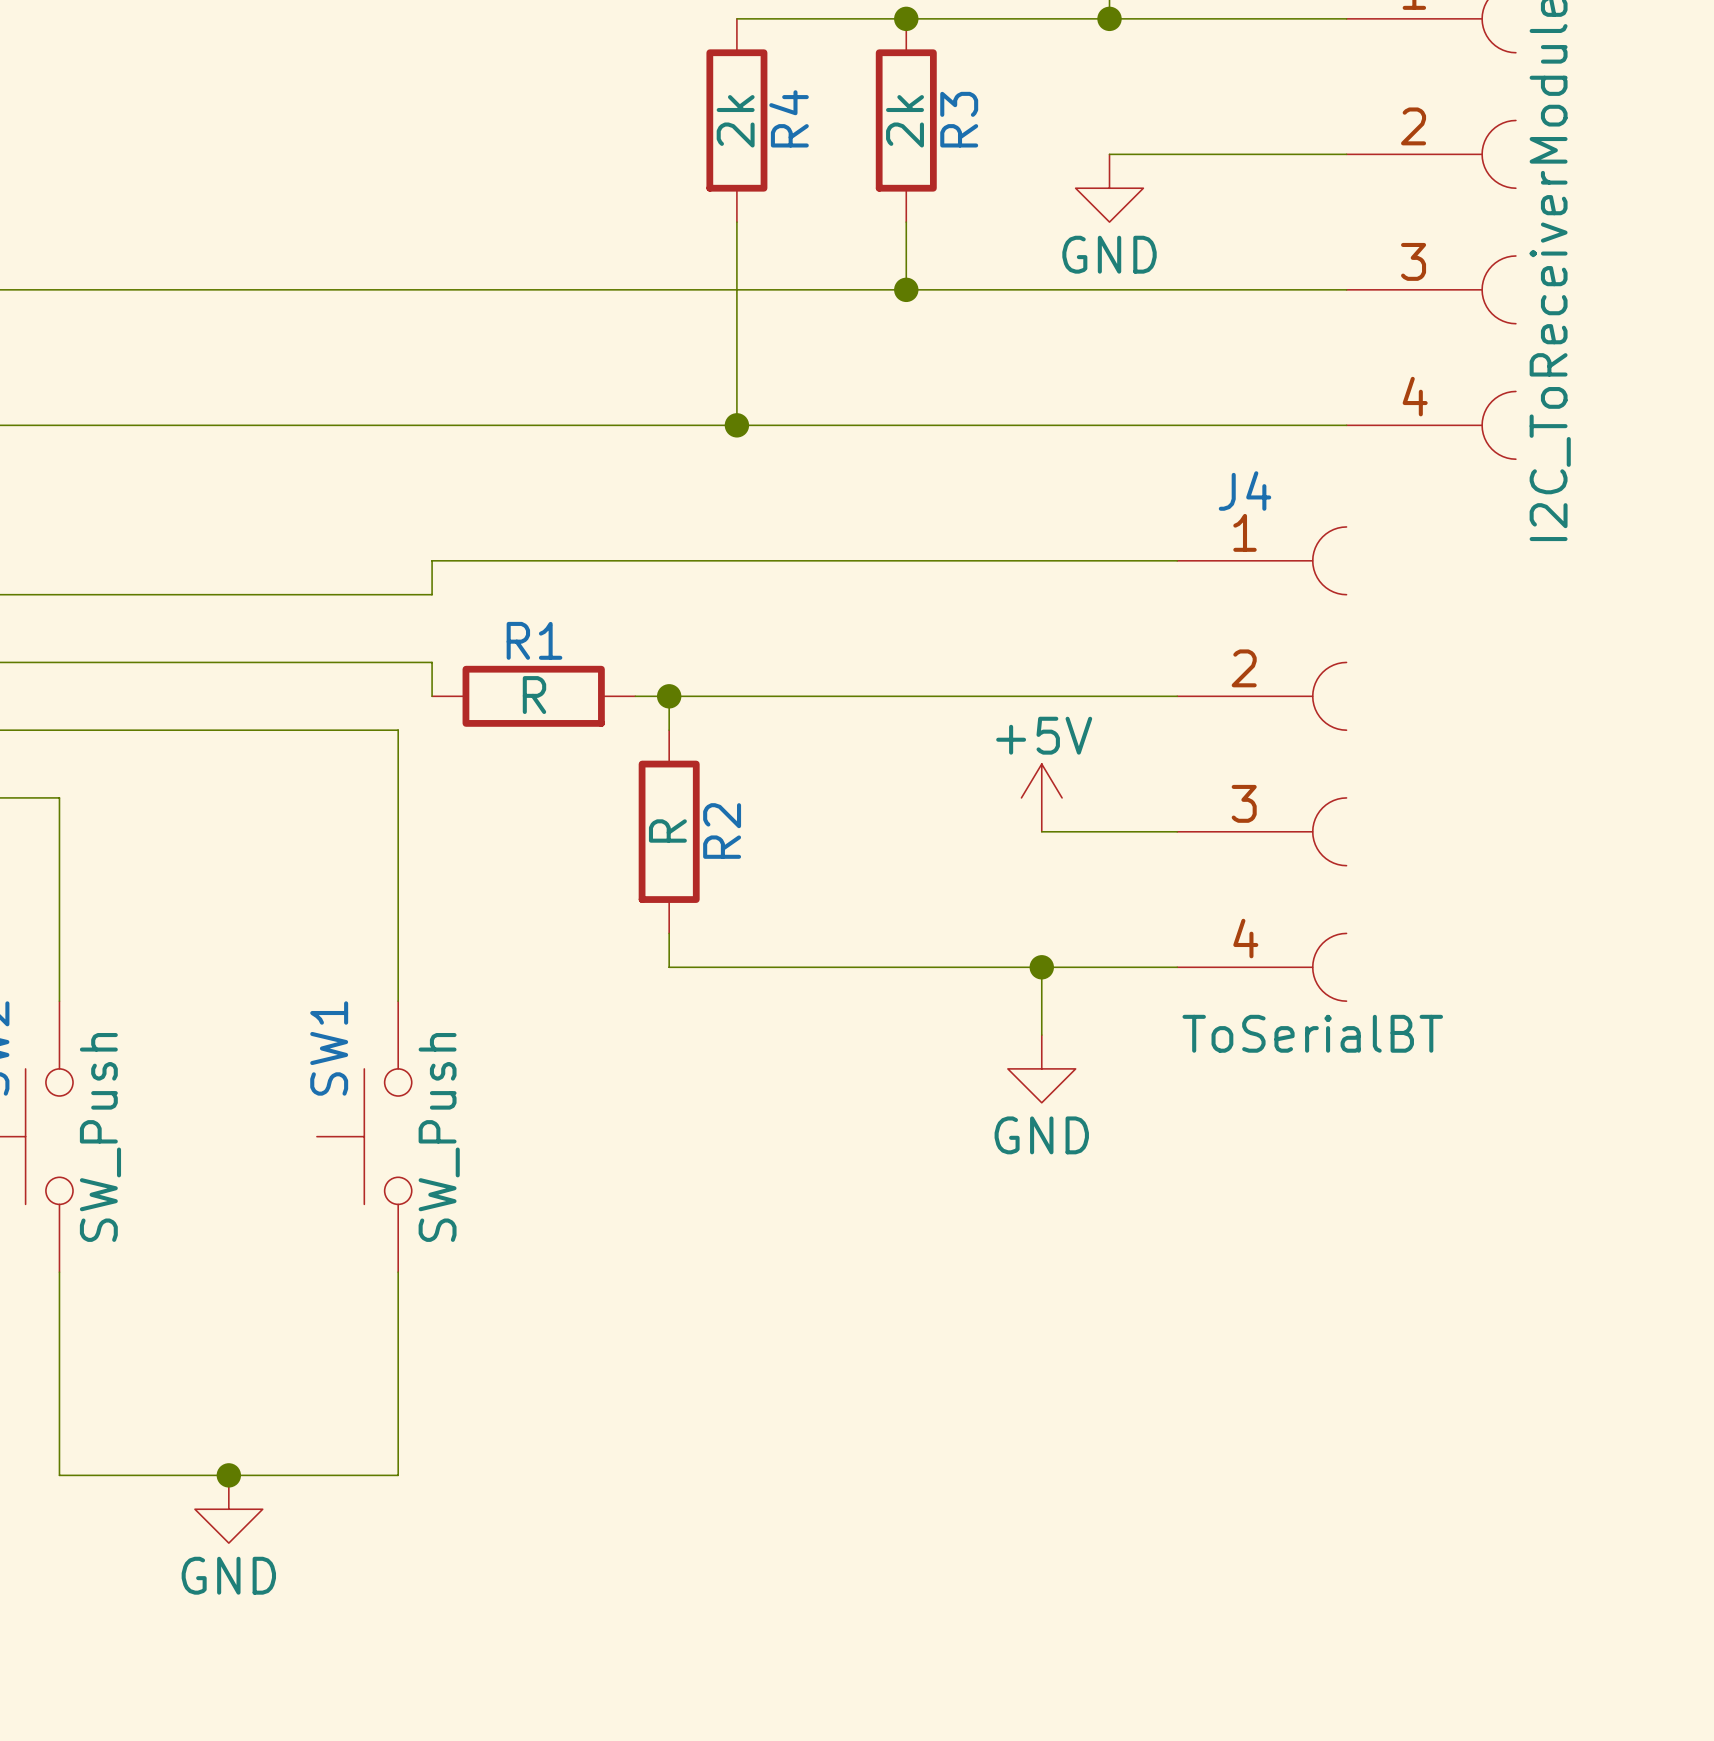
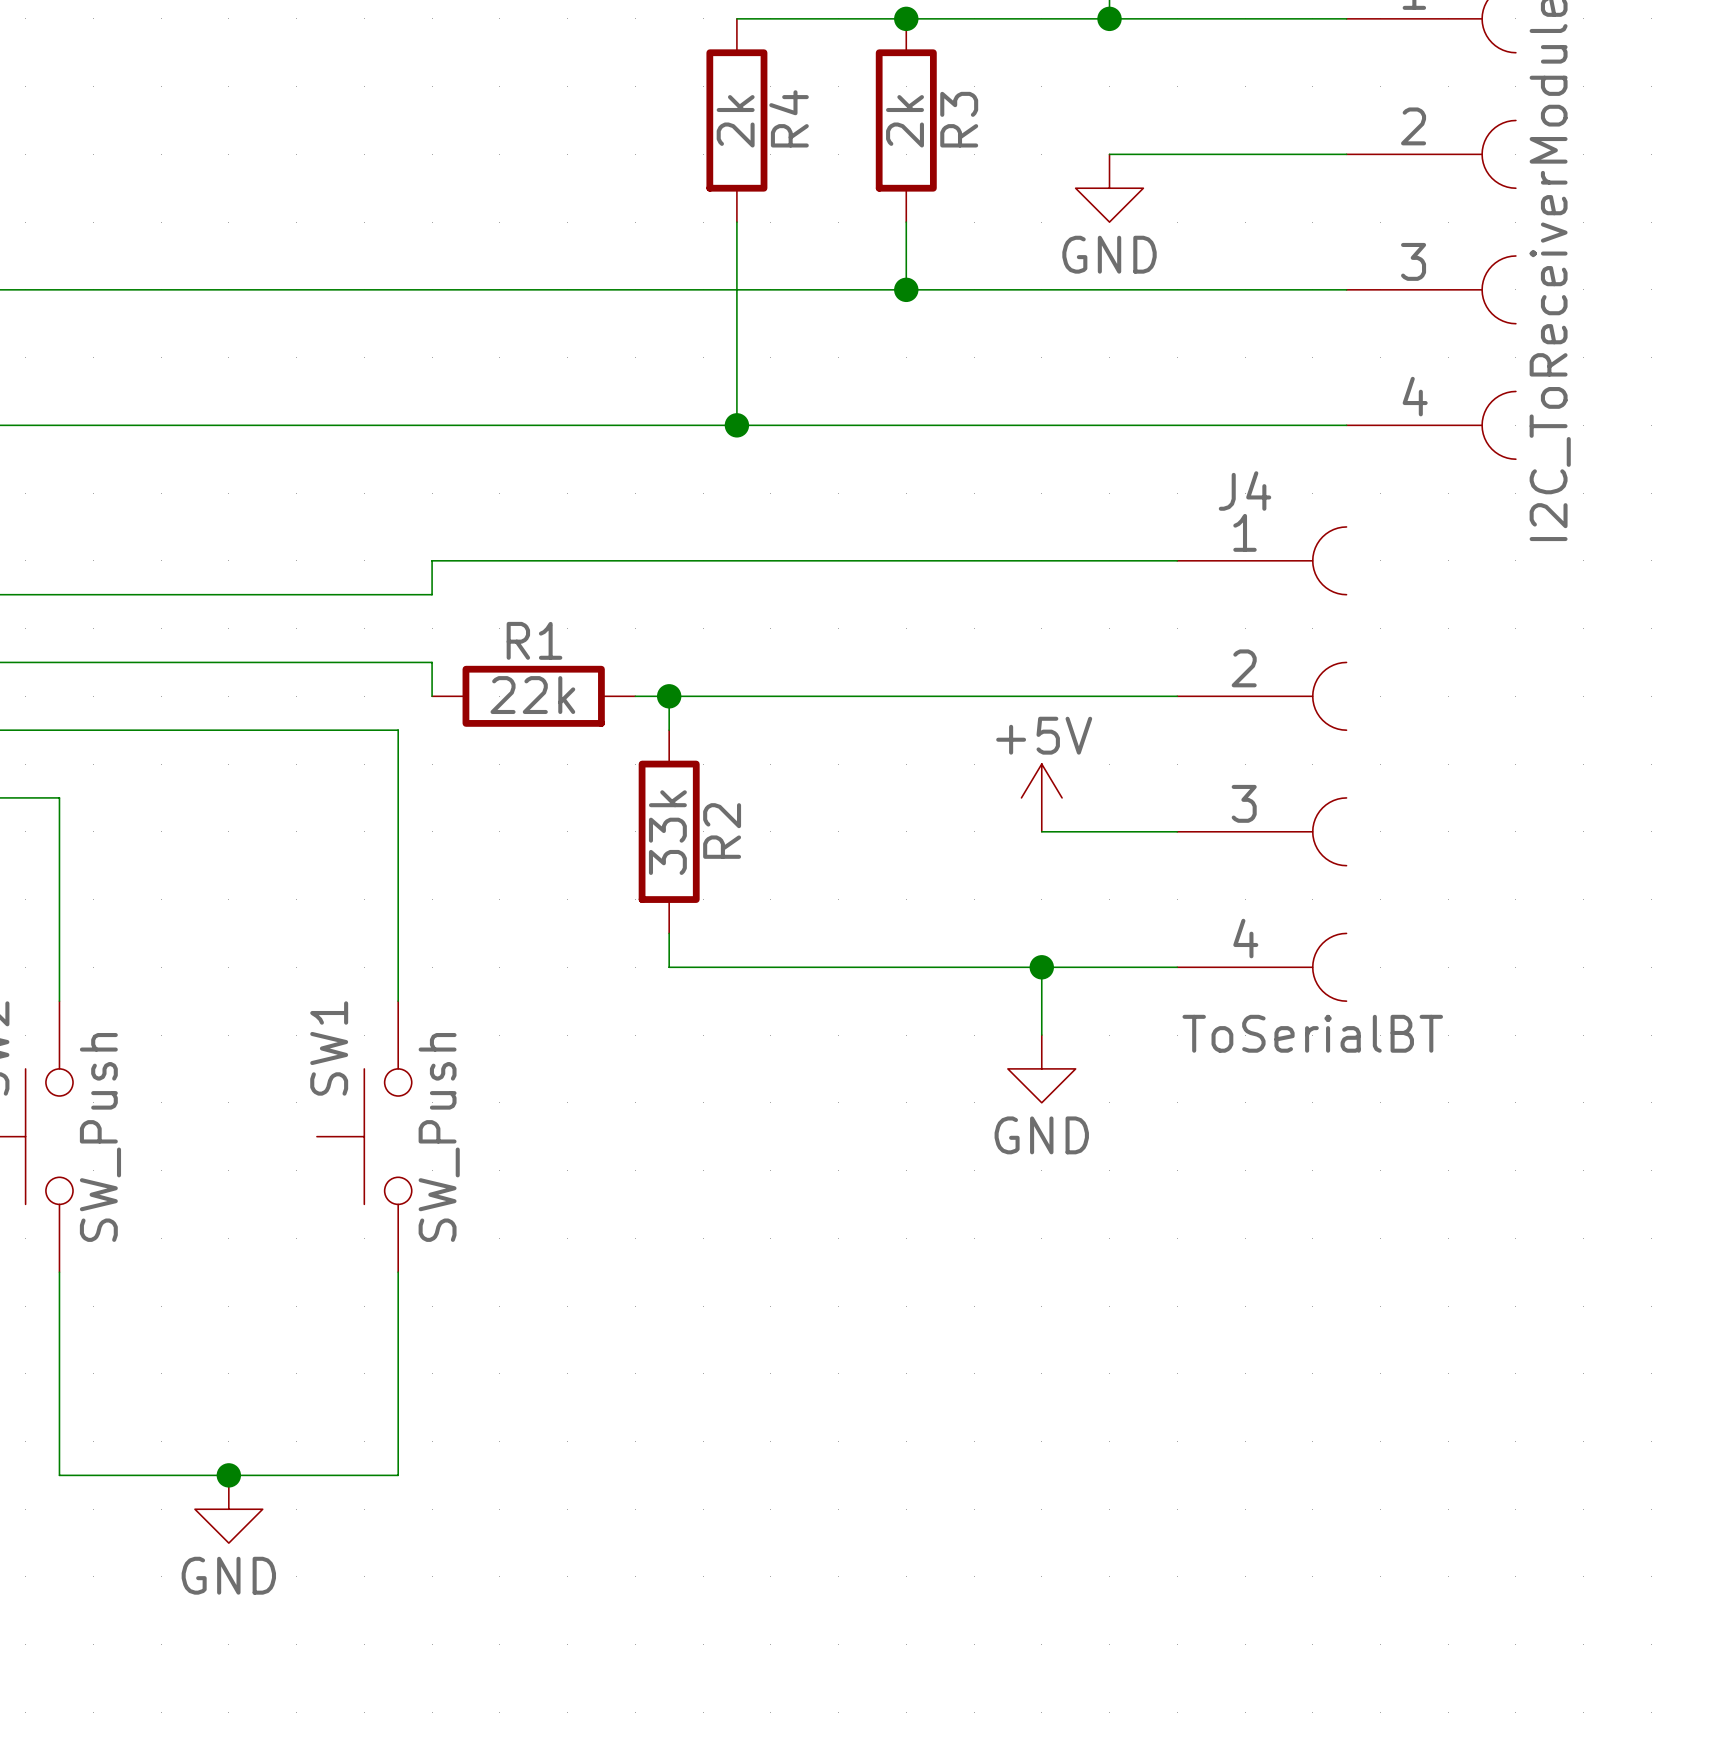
R1 value: R (534, 695) -> 22k (532, 695)
R2 value: R (667, 830) -> 33k (667, 832)

